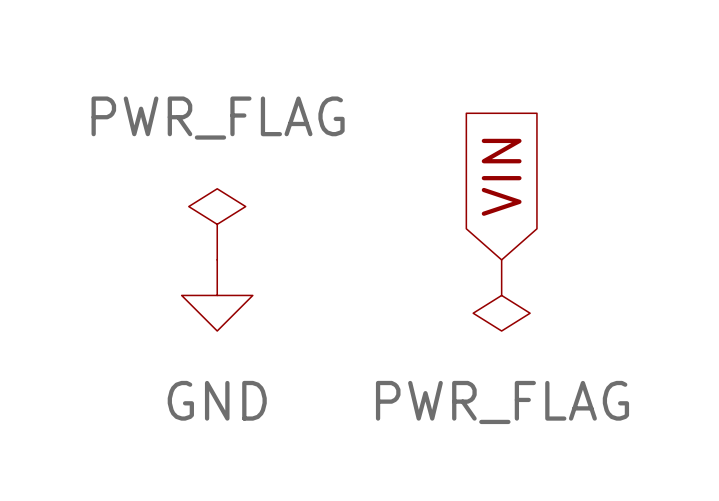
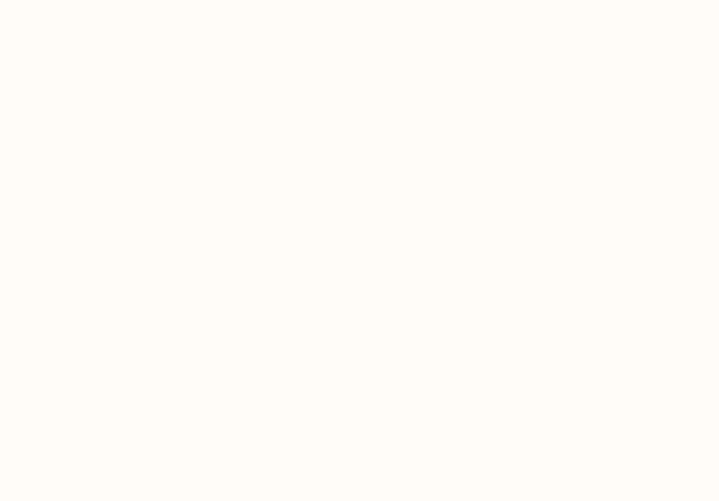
global label: VIN (501, 177) -> none
power symbol: PWR_FLAG (217, 224) -> none
power symbol: GND (217, 295) -> none
power symbol: PWR_FLAG (501, 295) -> none

